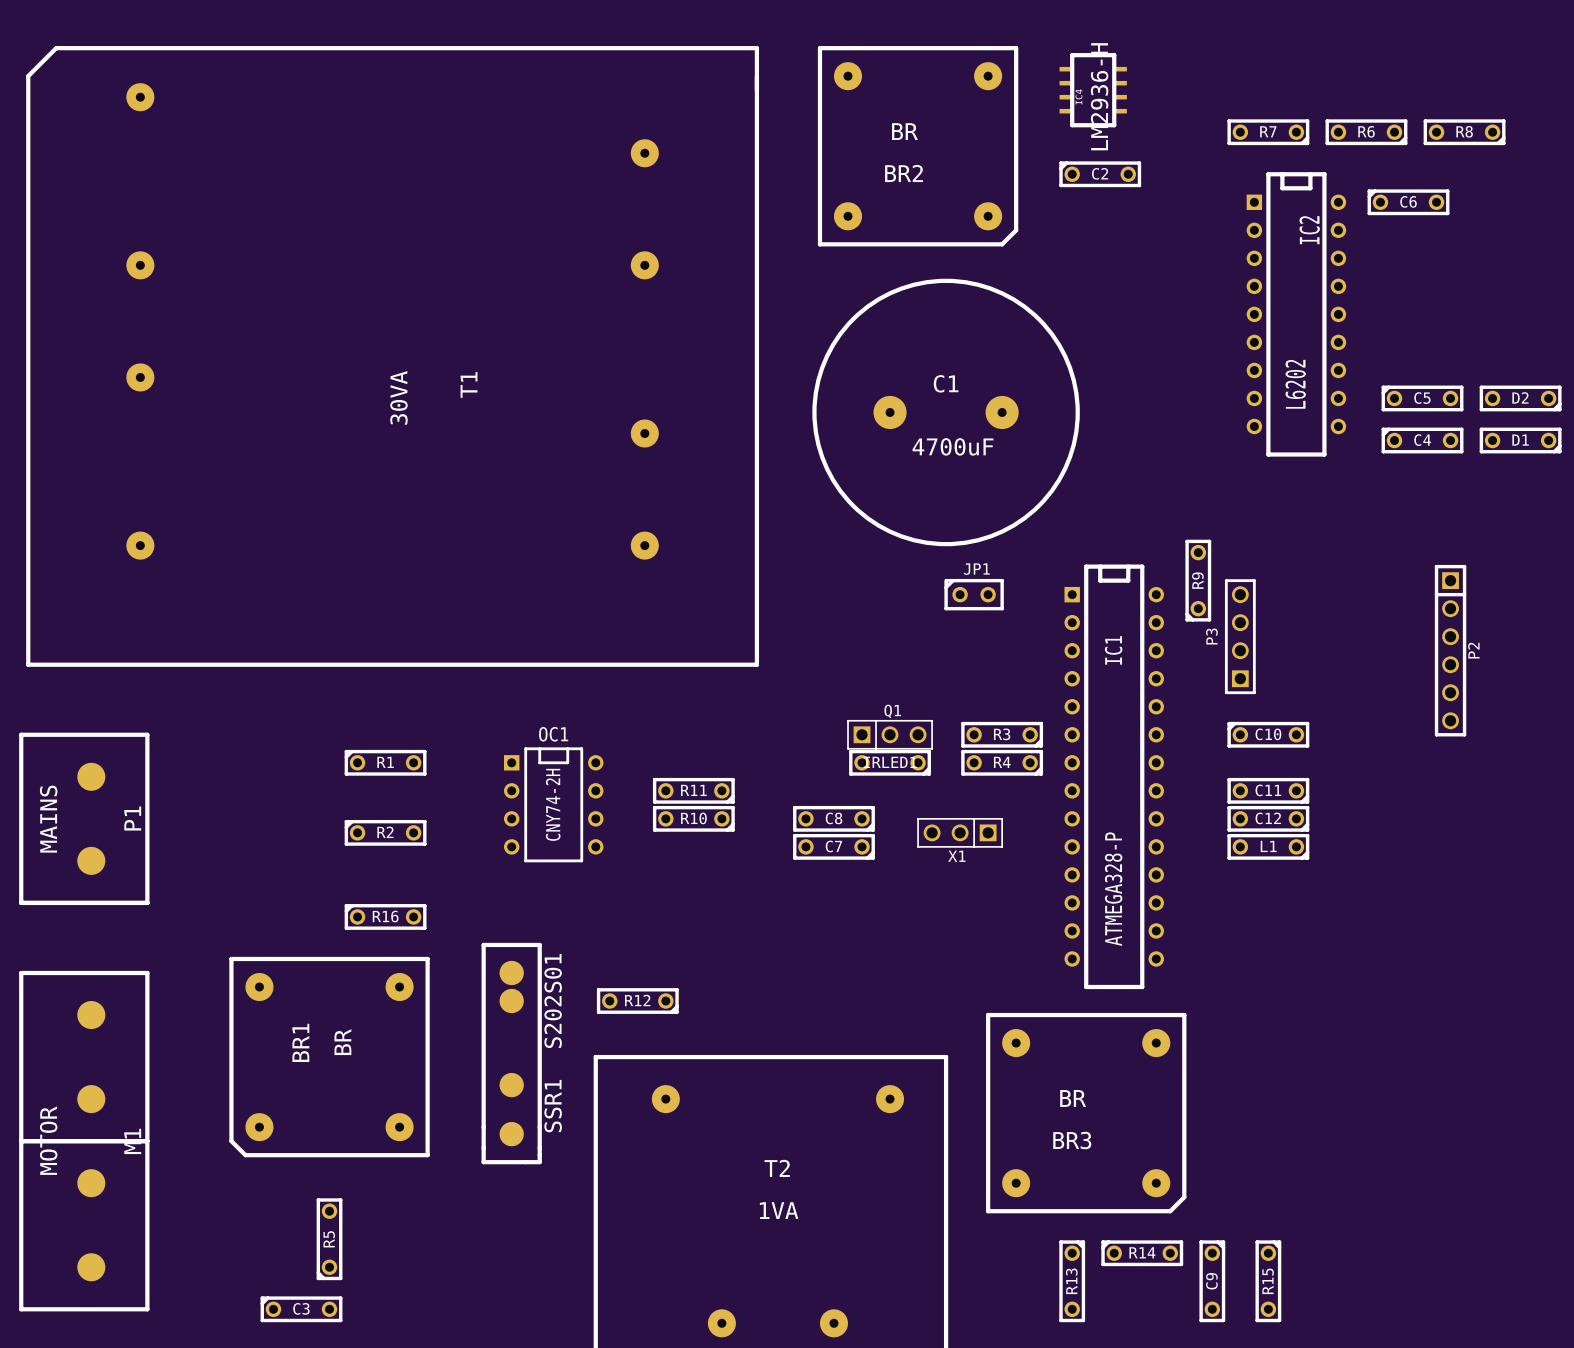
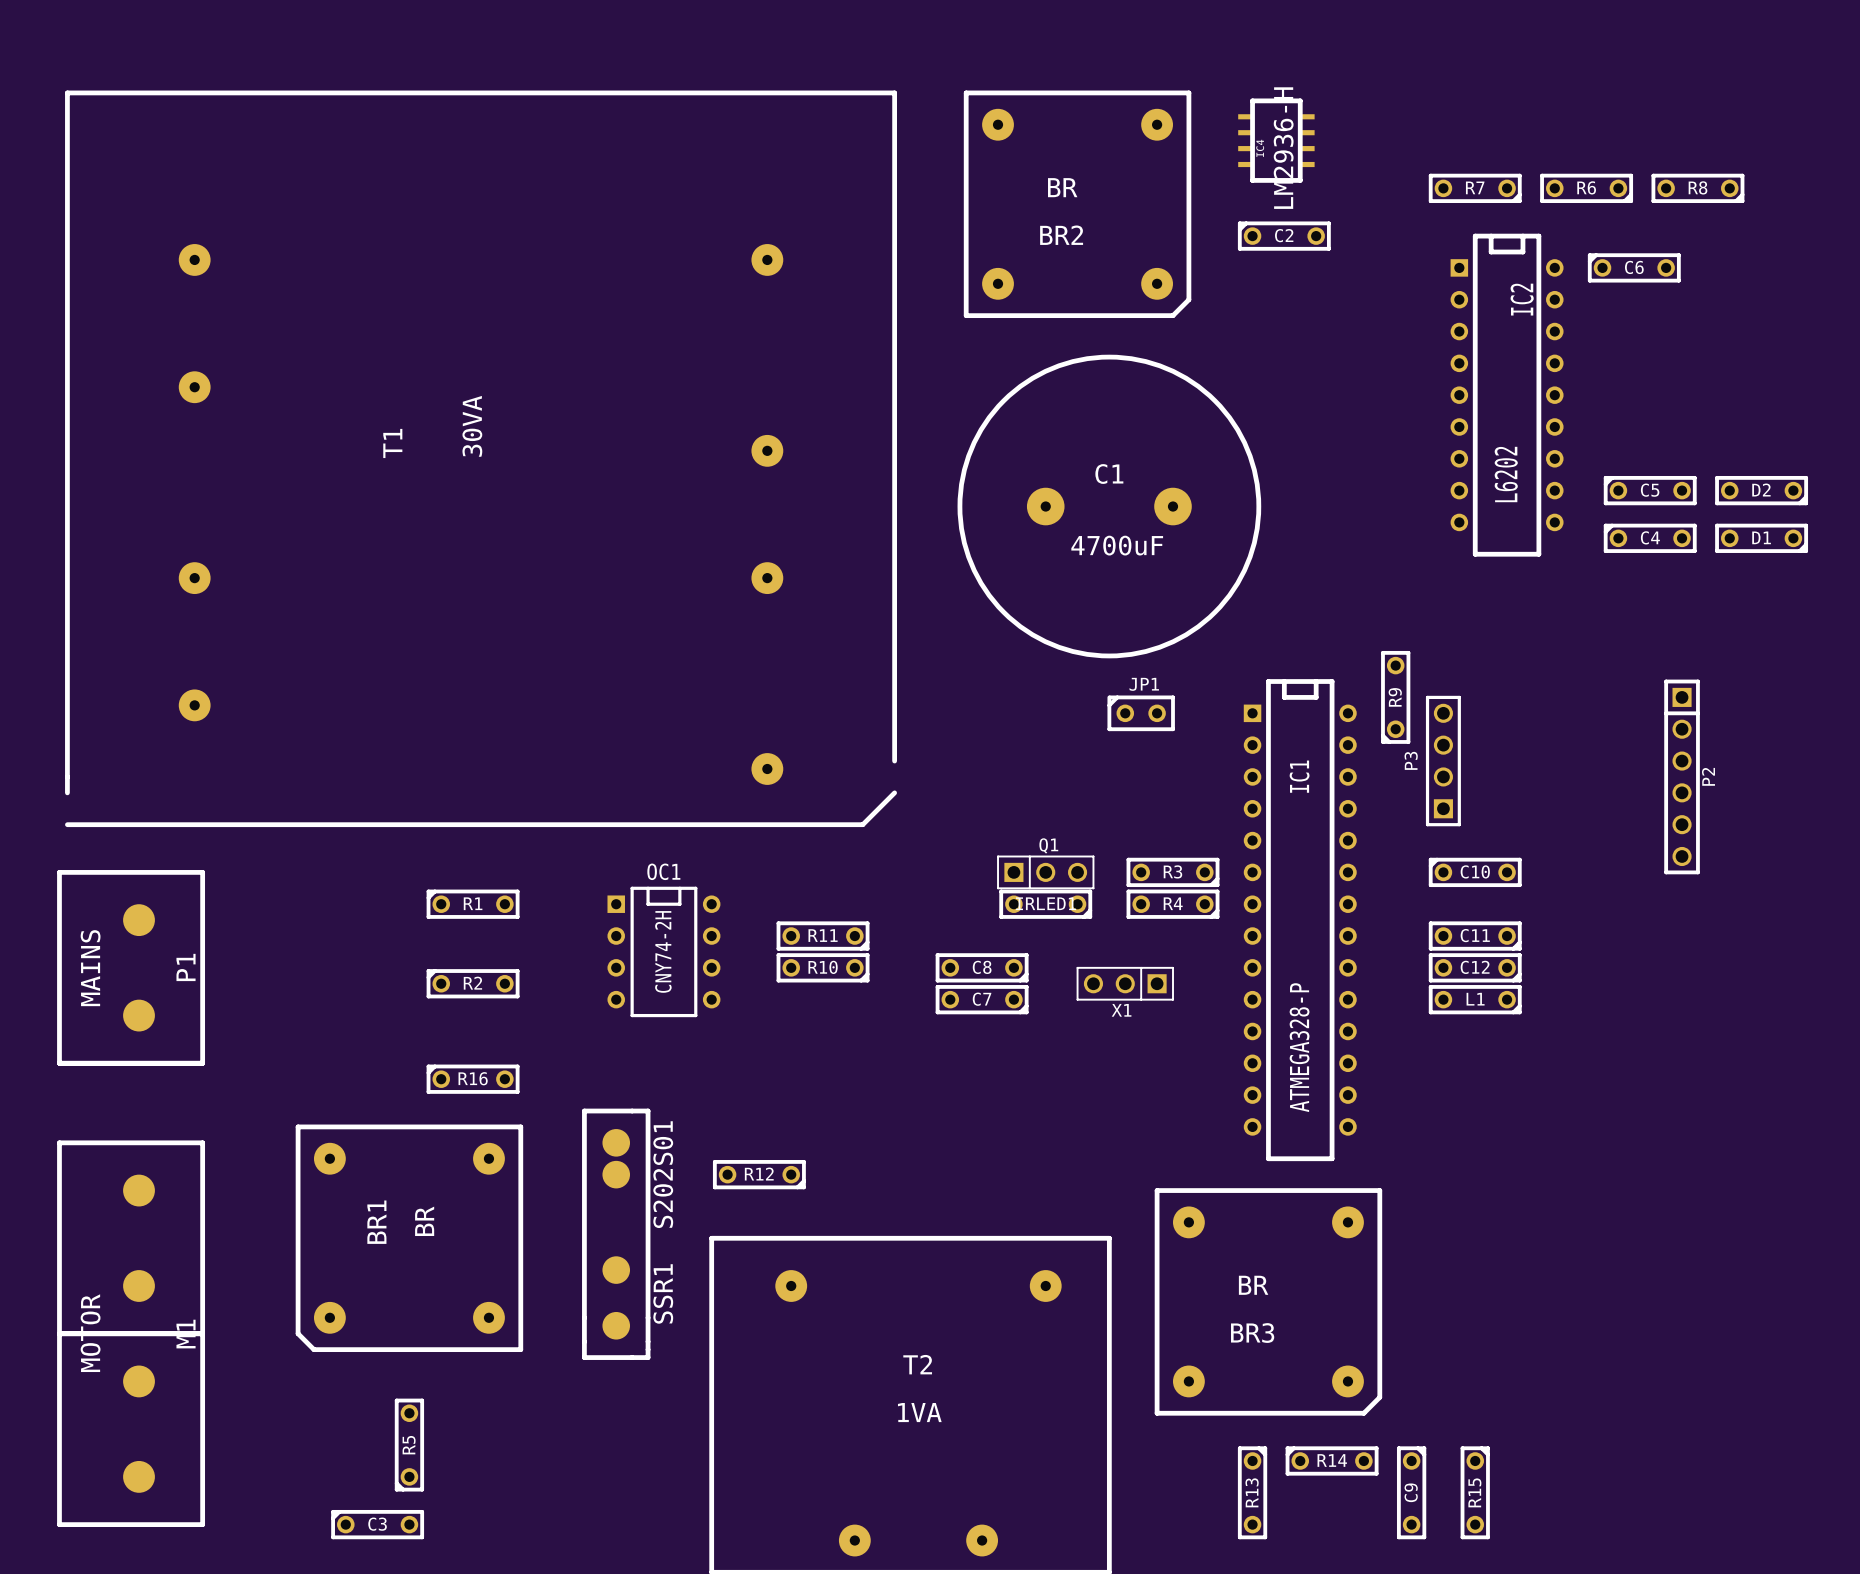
T1 footprint: [26, 46, 760, 667] -> [65, 90, 898, 828]
T1 name position: T1 (469, 384) -> T1 (392, 443)
T1 value position: 30VA (398, 397) -> 30VA (472, 426)

